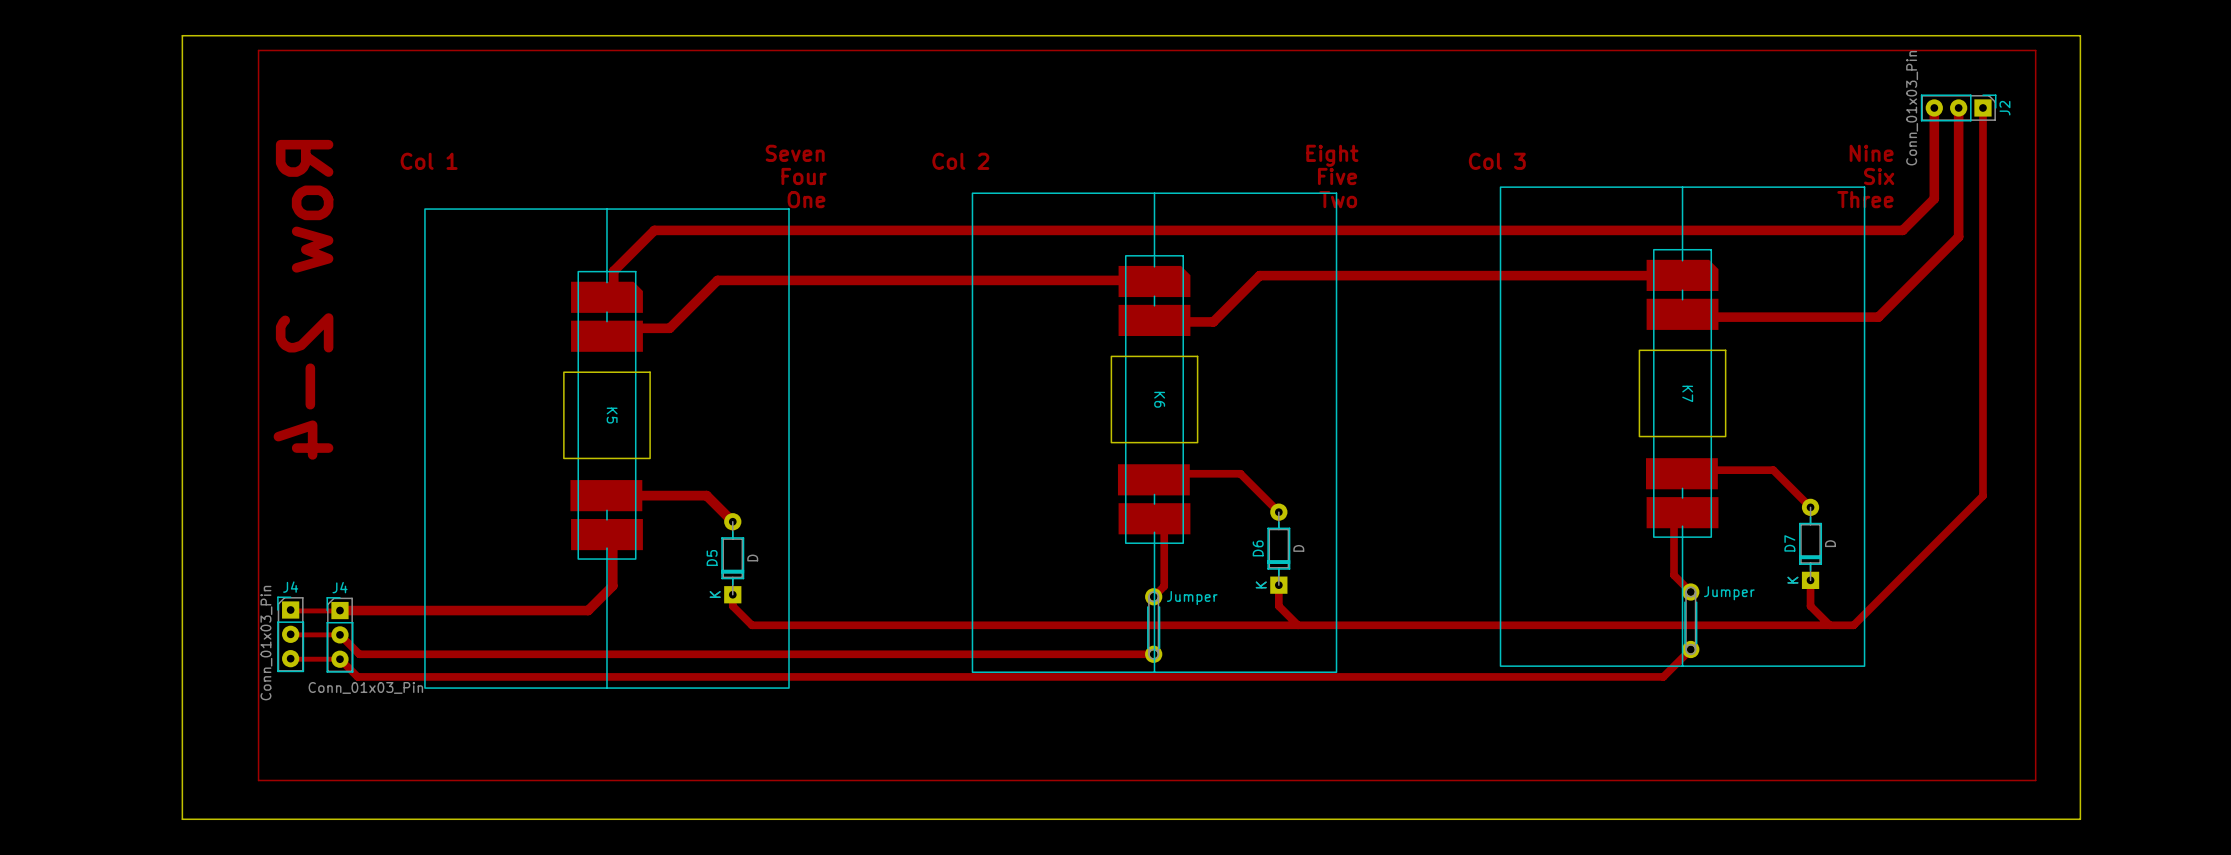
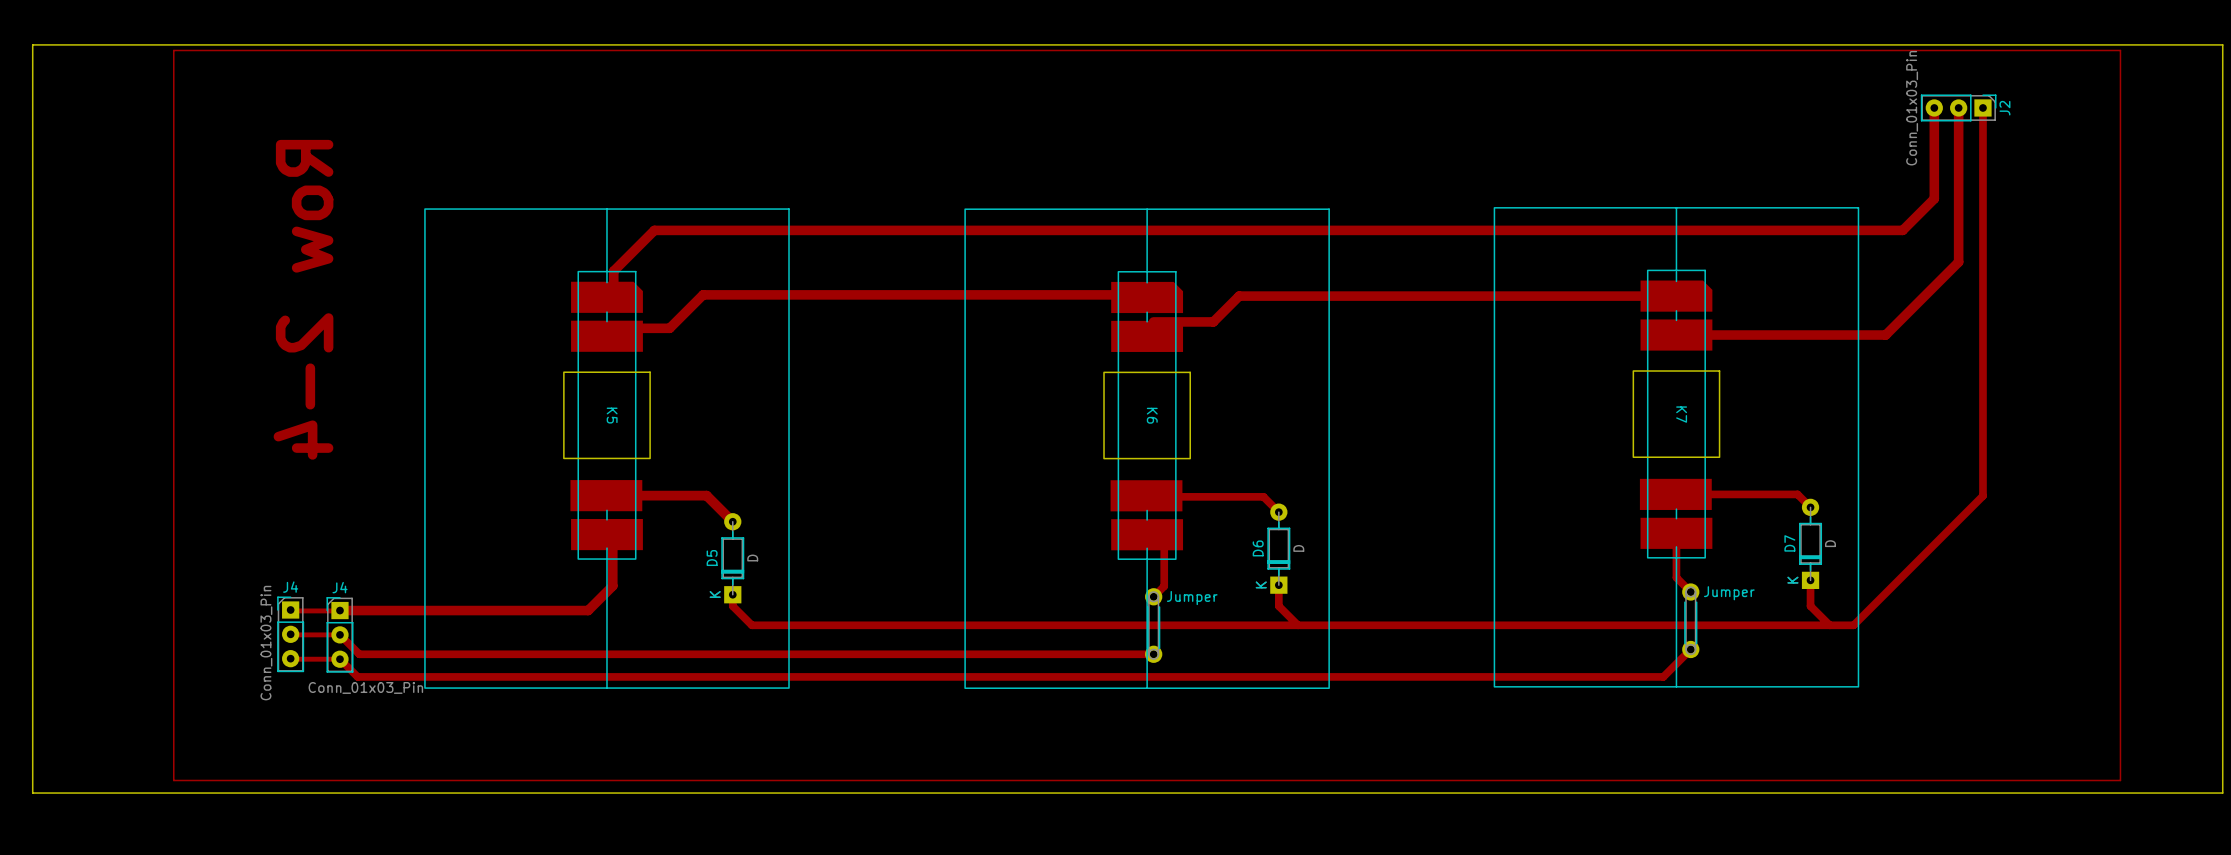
board edge: (182, 35) (2080, 35) (2080, 819) (182, 819) (182, 35) -> (32, 44) (32, 793) (2222, 793) (2222, 44) (32, 44)
track: (258, 50) (258, 780) -> (258, 50) (173, 50) (173, 780) (258, 780)
track: (2035, 50) (2035, 780) -> (2035, 50) (2120, 50) (2120, 780) (2035, 780)
text: Seven (795, 153) -> none
text: Nine (1871, 153) -> none
text: Eight (1332, 155) -> none
text: Col 1 (429, 161) -> none
text: Col 2 (960, 161) -> none
text: Col 3 (1497, 161) -> none
text: Four (804, 176) -> none
text: Five (1337, 176) -> none
text: Six (1879, 176) -> none
text: One (806, 199) -> none
text: Two (1338, 199) -> none
text: Three (1865, 199) -> none
track: (1958, 236) (1878, 317) (1690, 317) -> (1958, 236) (1958, 262) (1885, 335) (1676, 335)
track: (1690, 275) (1259, 275) (1239, 296) -> (1670, 296) (1239, 296)
track: (1154, 280) (717, 280) (703, 294) -> (1147, 297) (1144, 294) (703, 294)
K7 position: (1682, 426) -> (1676, 447)
K6 position: (1154, 432) -> (1147, 448)
track: (1681, 473) (1685, 470) (1773, 470) (1797, 494) -> (1709, 494) (1797, 494)
track: (1153, 479) (1159, 473) (1240, 473) (1263, 496) -> (1170, 496) (1263, 496)
track: (1689, 519) (1682, 512) (1674, 521) (1674, 575) (1676, 577) -> (1676, 533) (1676, 577)

